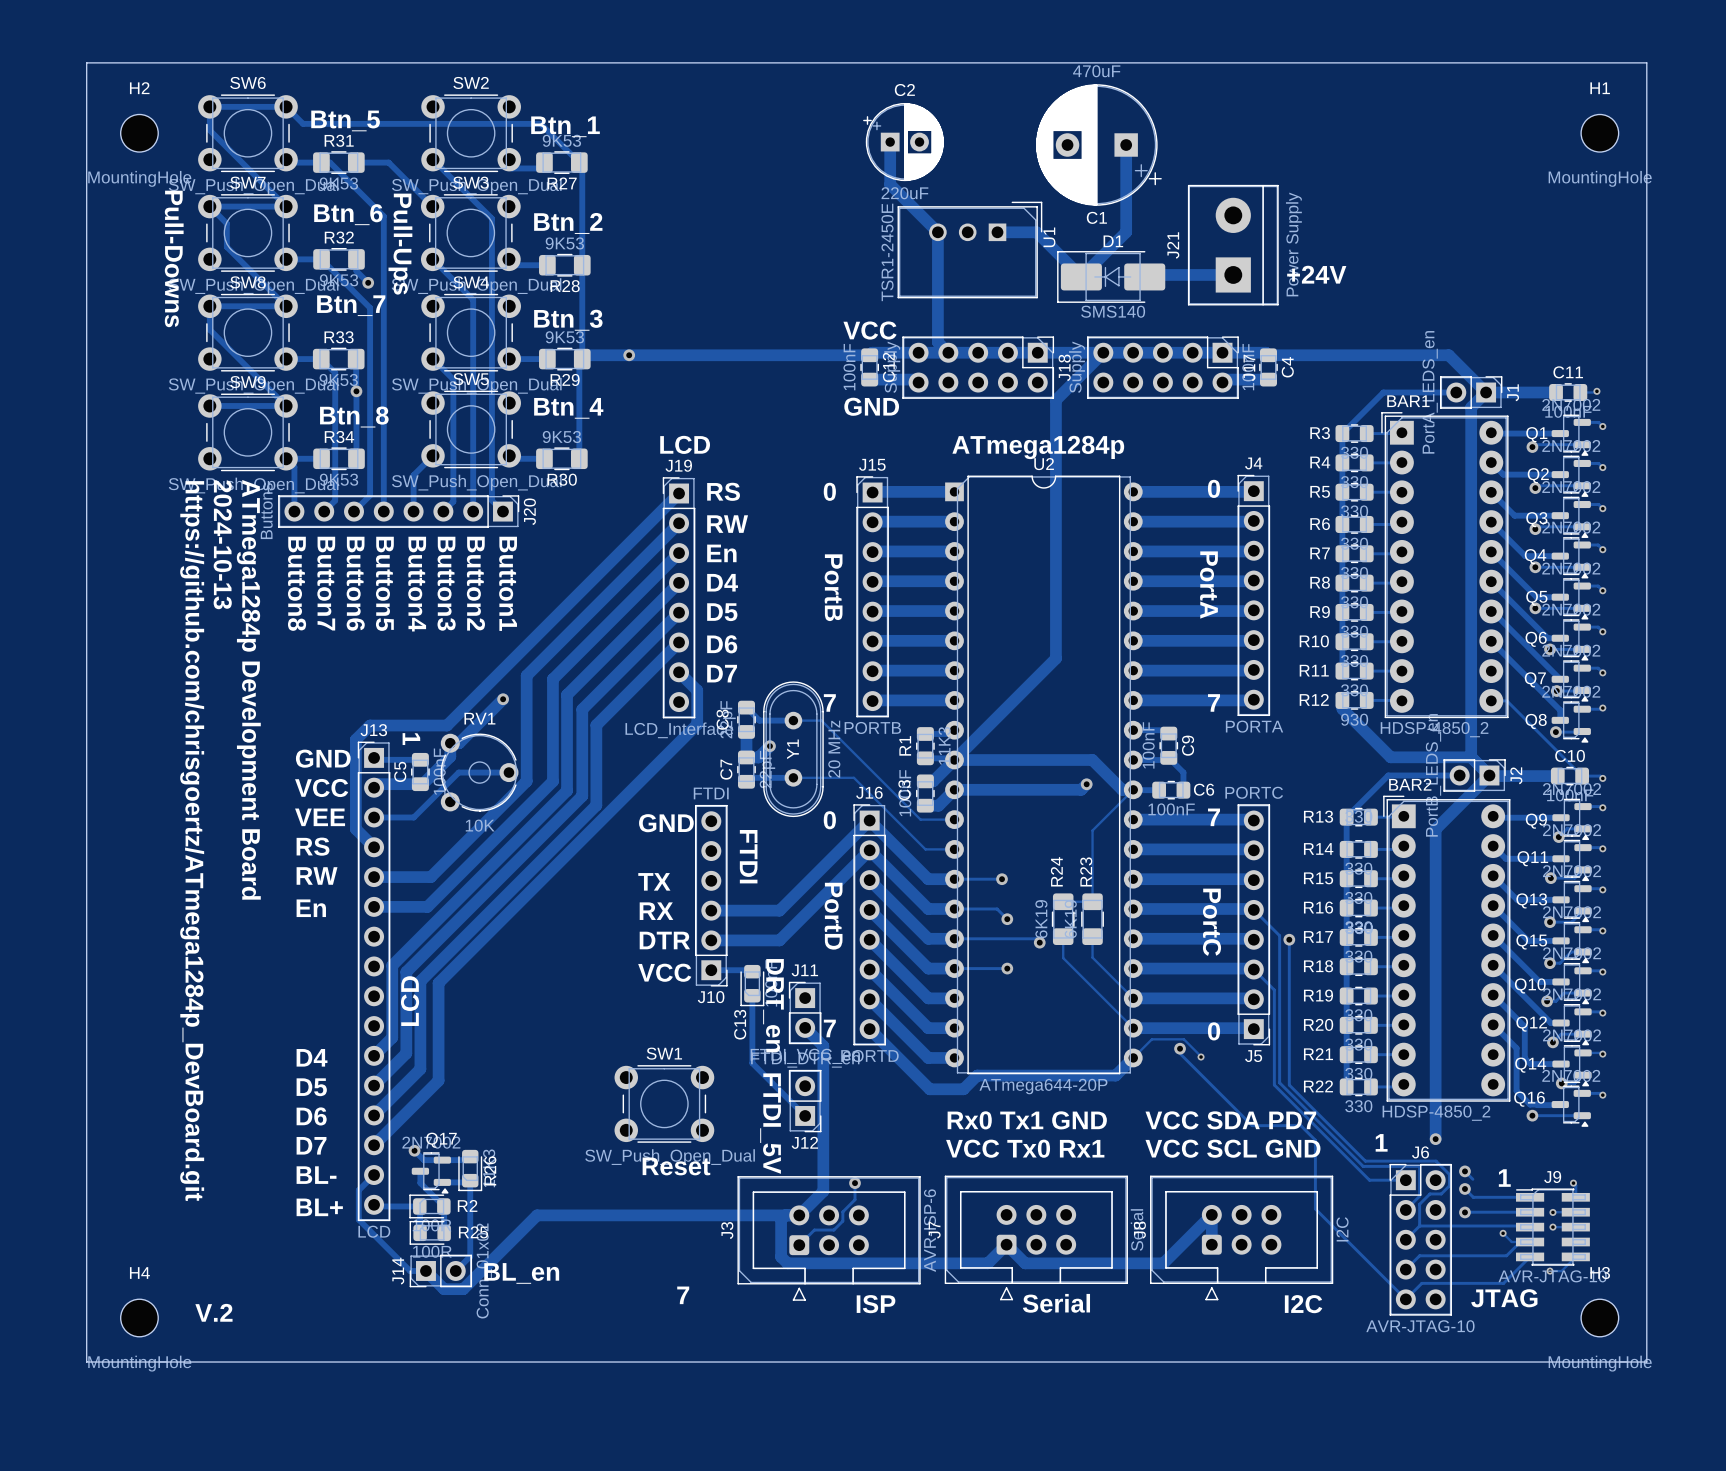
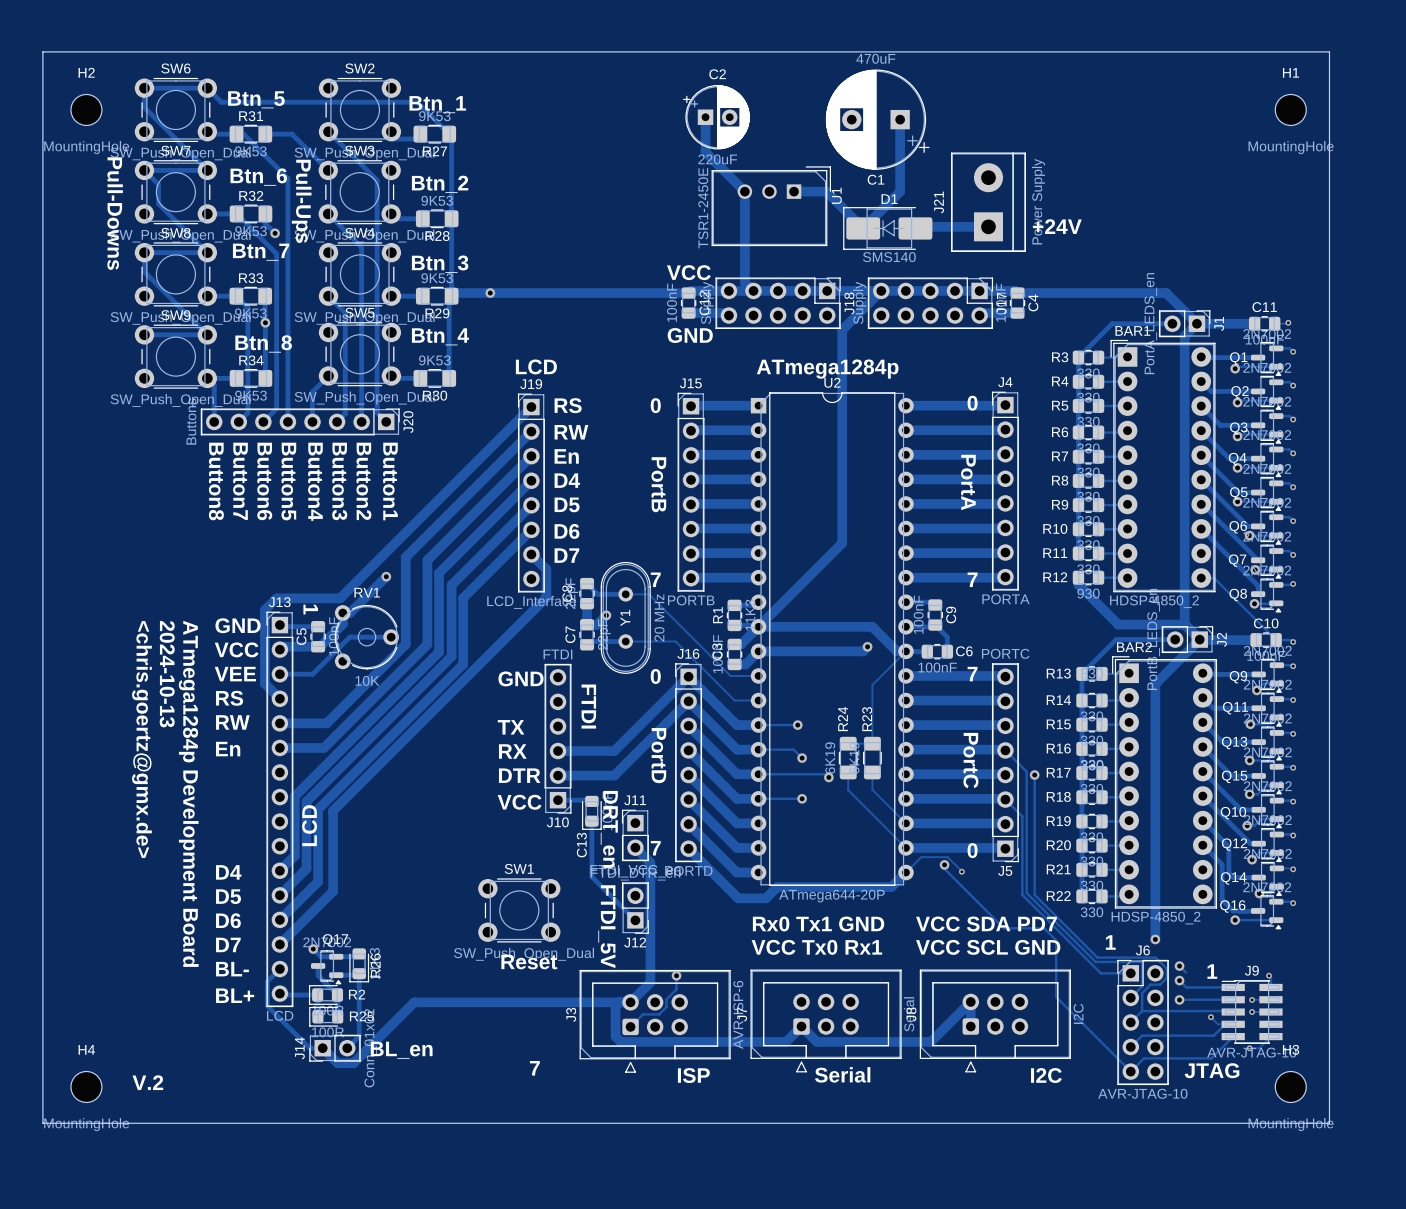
text position: 2024-10-13 (222, 544) -> 2024-10-13 (167, 674)
text position: ATmega1284p Development Board (248, 689) -> ATmega1284p Development Board (188, 793)
text: https://github.com/chrisgoertz/ATmega1284p_DevBoard.git (192, 841) -> none
text: none -> <chris.goertz@gmx.de> (141, 739)

